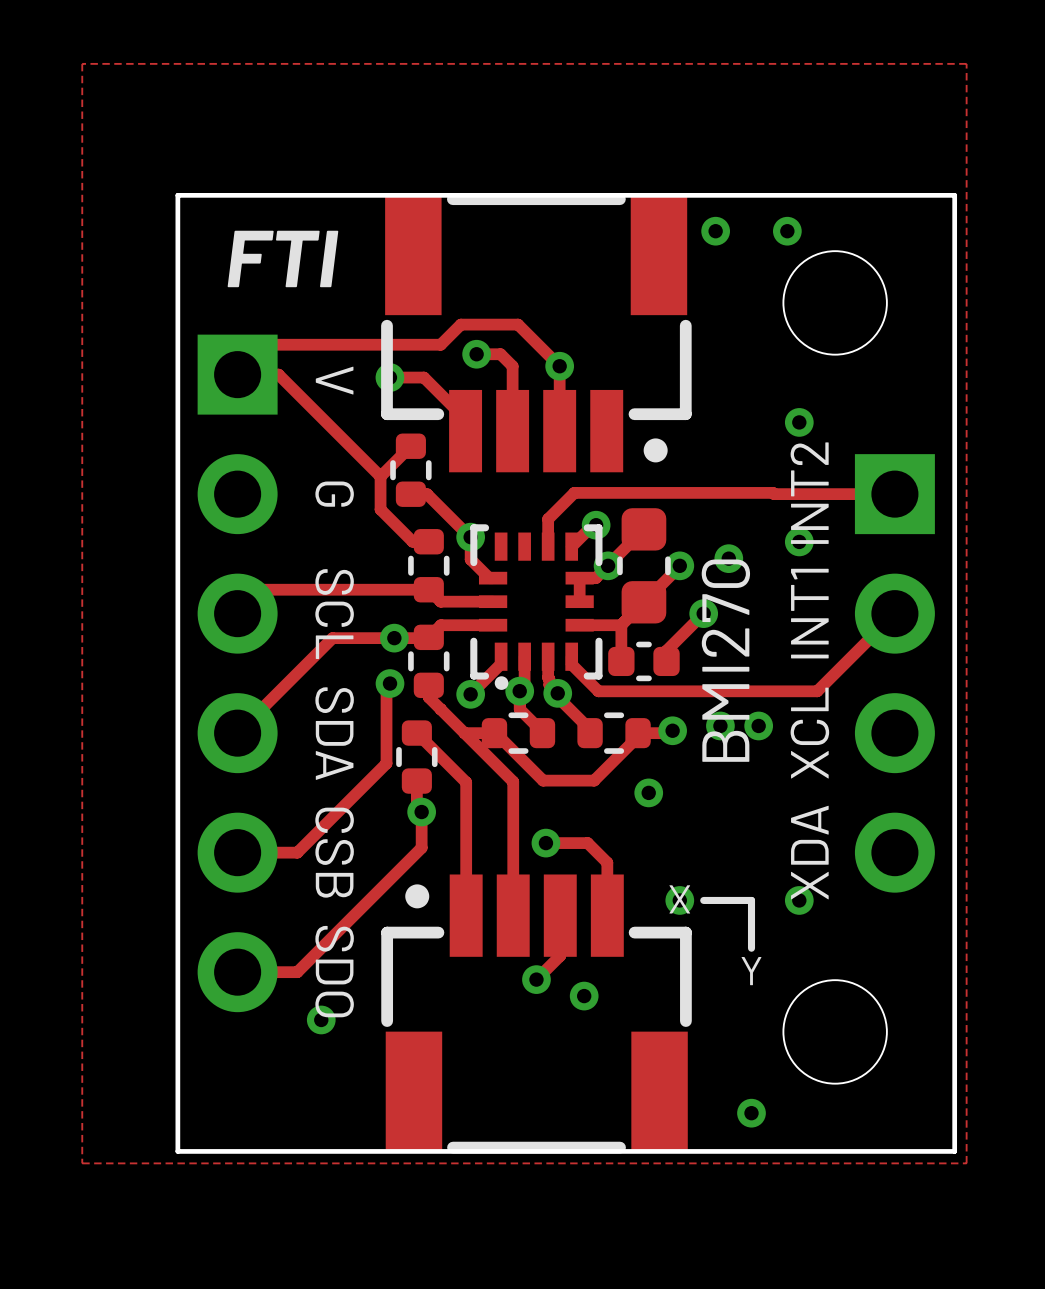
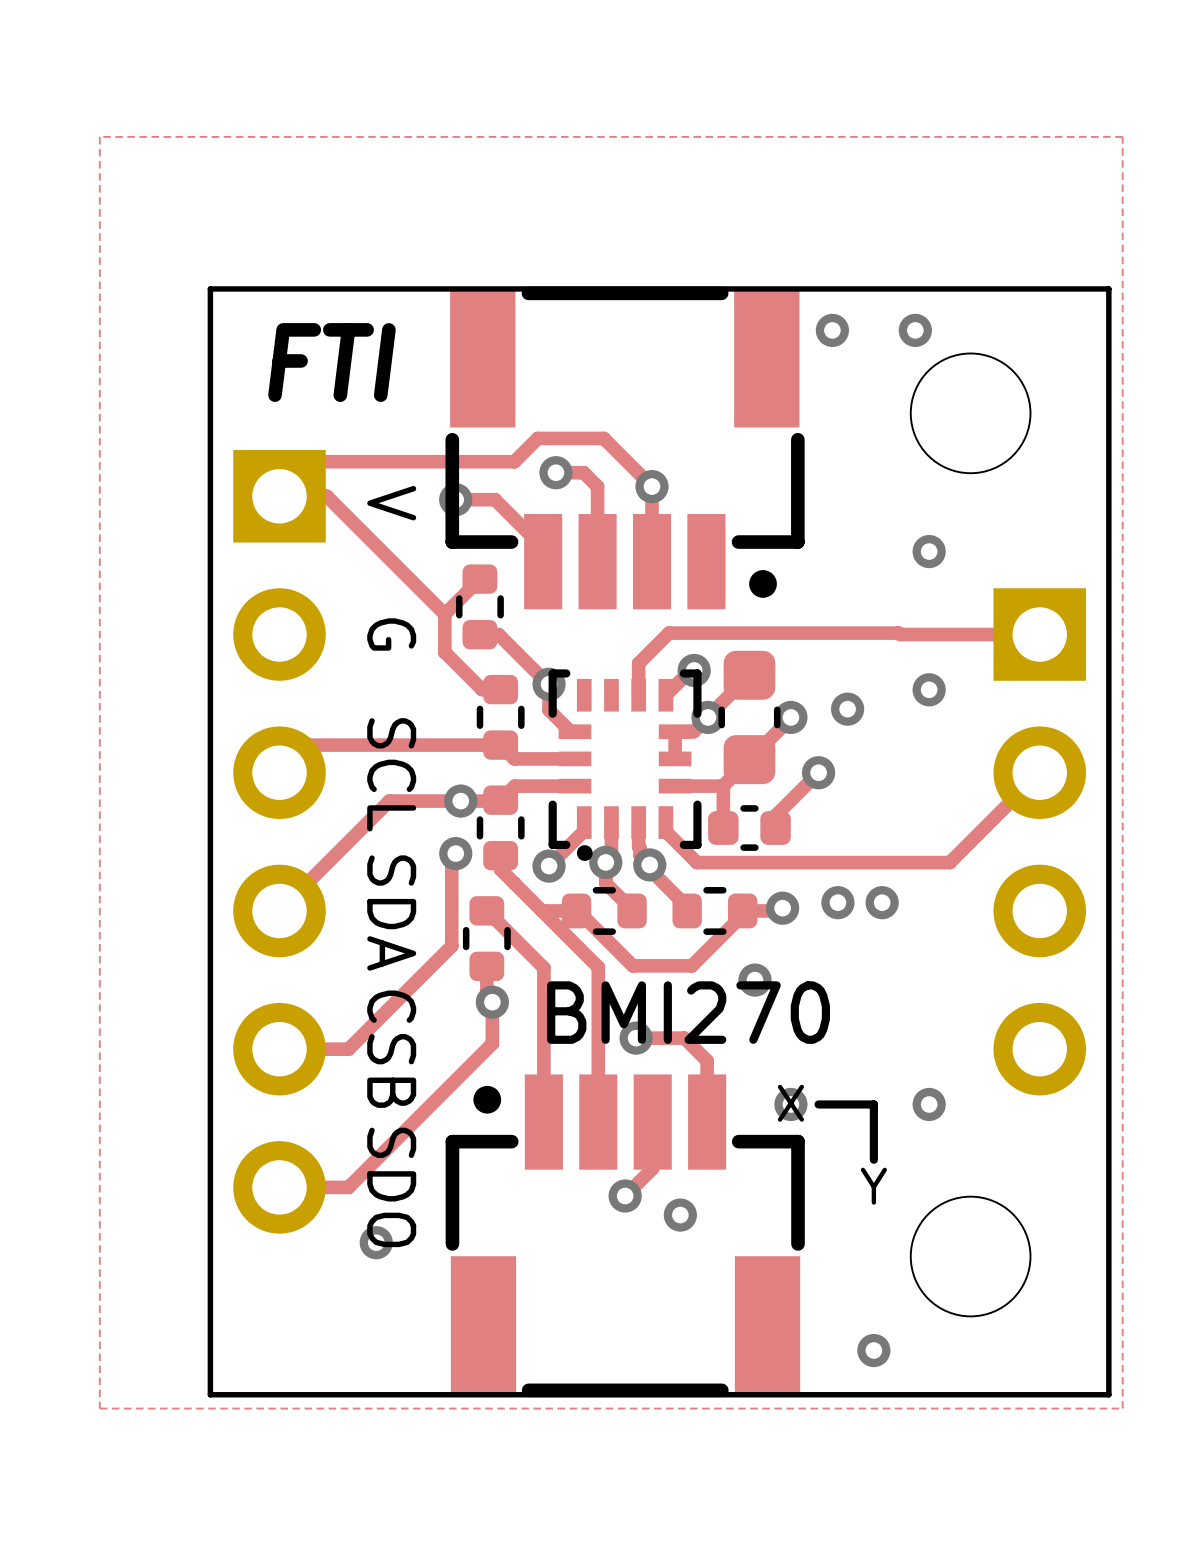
text: INT2 (809, 493) -> none
text: INT1 (809, 613) -> none
text rotation: 0° (725, 660) -> 90° clockwise (688, 1012)
text: XCL (809, 733) -> none
text: XDA (809, 852) -> none

